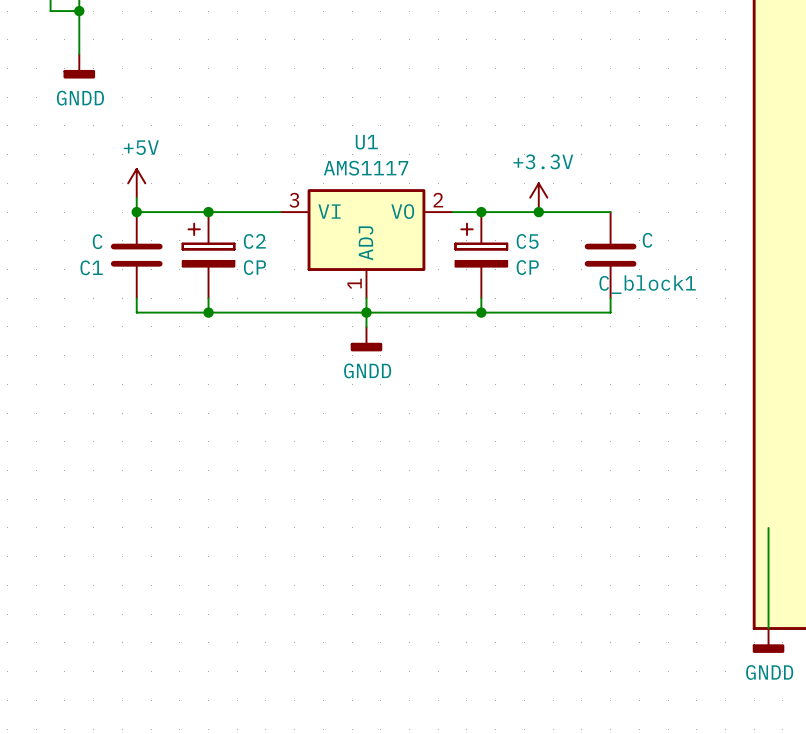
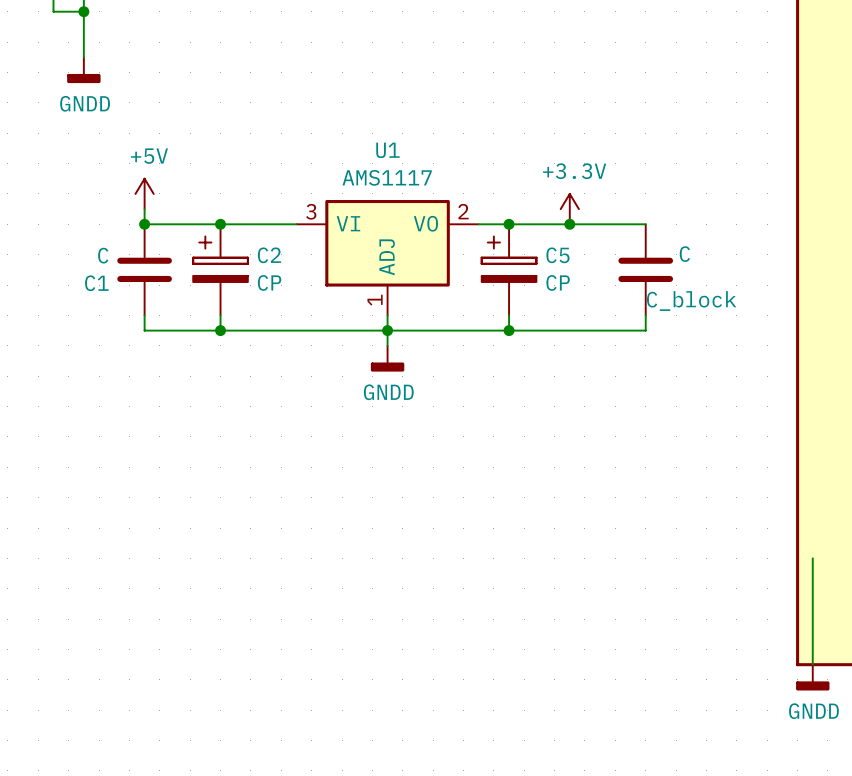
C_block1 name: C_block1 (647, 284) -> C_block (691, 301)

